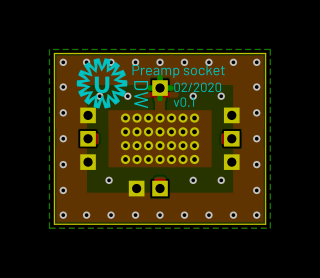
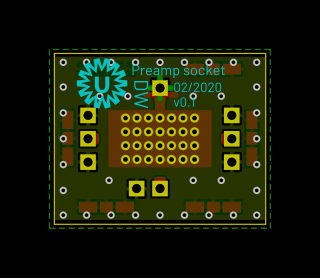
part: none -> (213, 69)
part: none -> (67, 138)
part: (160, 138) -> none
part: none -> (251, 138)
part: none -> (106, 207)
part: none -> (213, 207)

